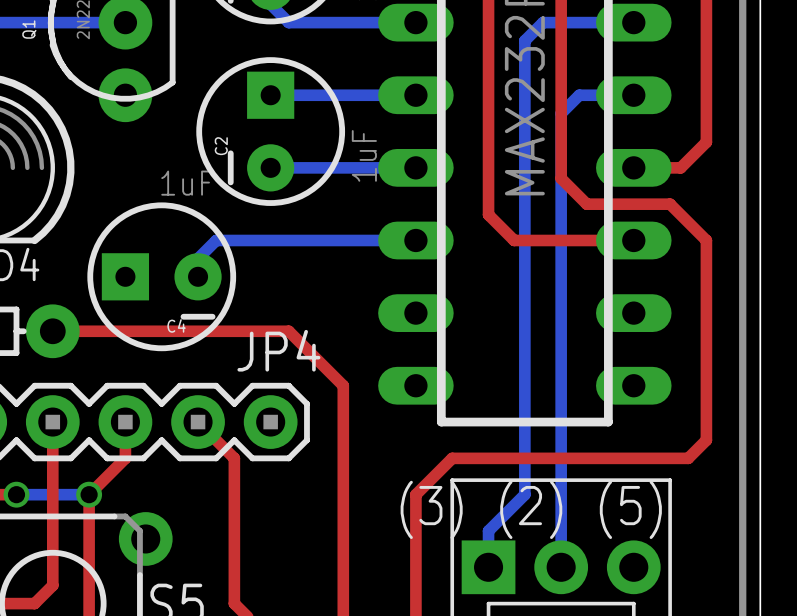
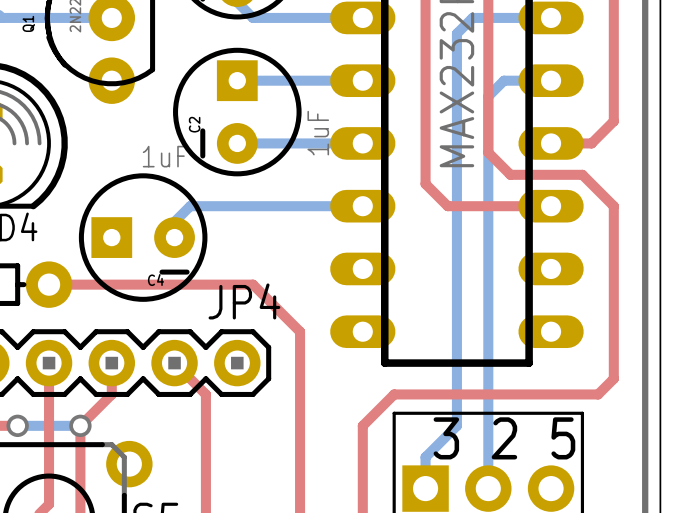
text: (3) (2) (5) (531, 509) -> 3 2 5 (504, 438)

